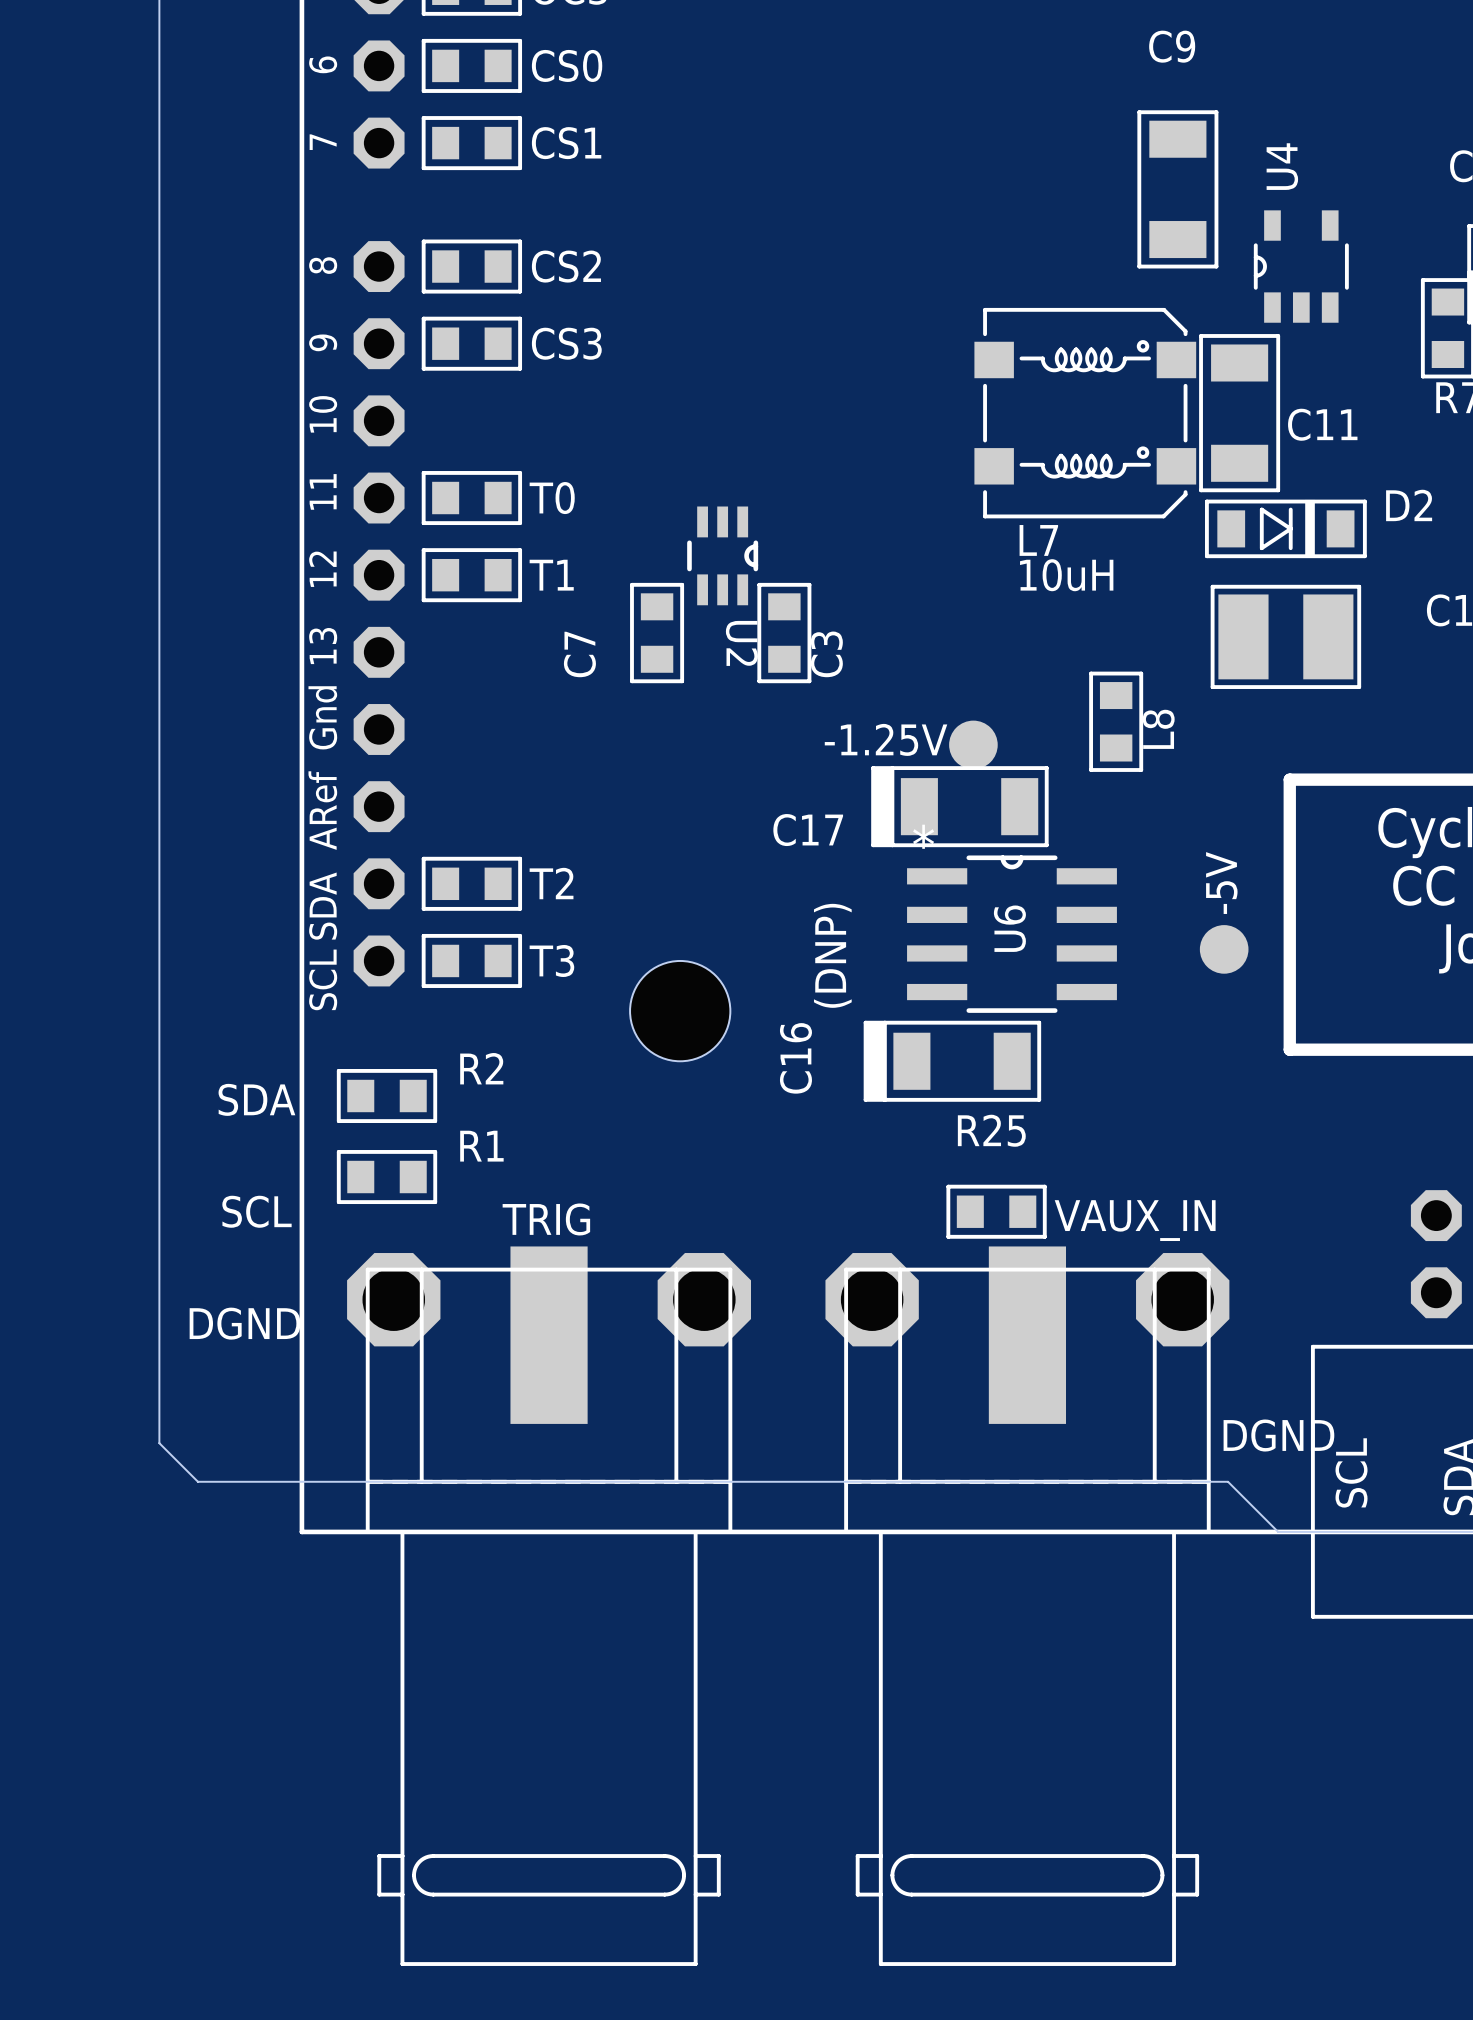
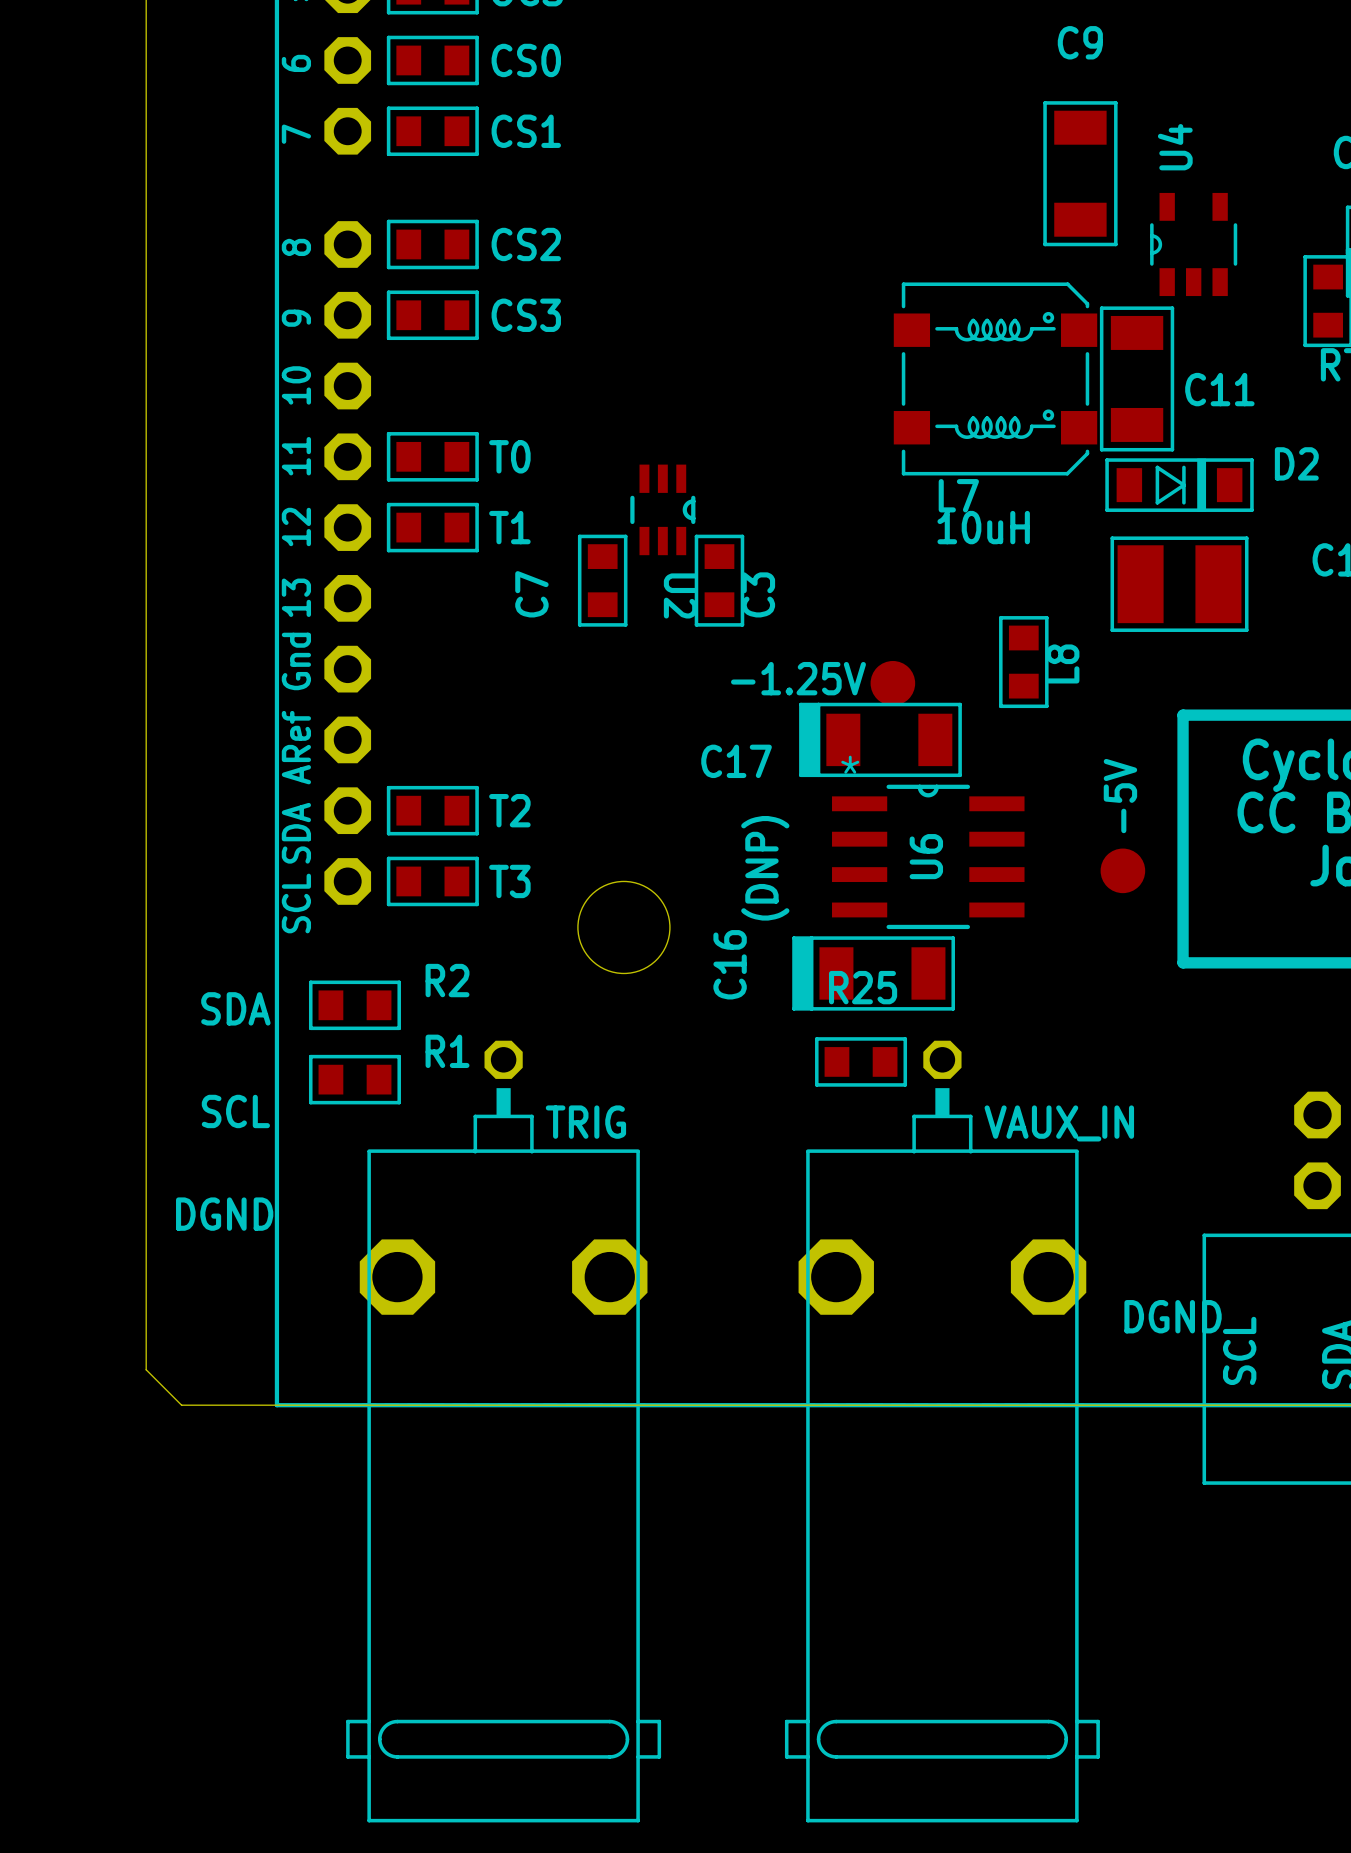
R25 position: (996, 1211) -> (861, 1061)
board edge: (159, 1443) (197, 1481) (1228, 1481) (1278, 1531) -> (146, 1323) (146, 1369) (181, 1405) (1172, 1405)
TRIG: none -> (503, 1431)
VAUX_IN: none -> (942, 1431)
TRIG: (549, 1606) -> none
VAUX_IN: (1027, 1606) -> none

